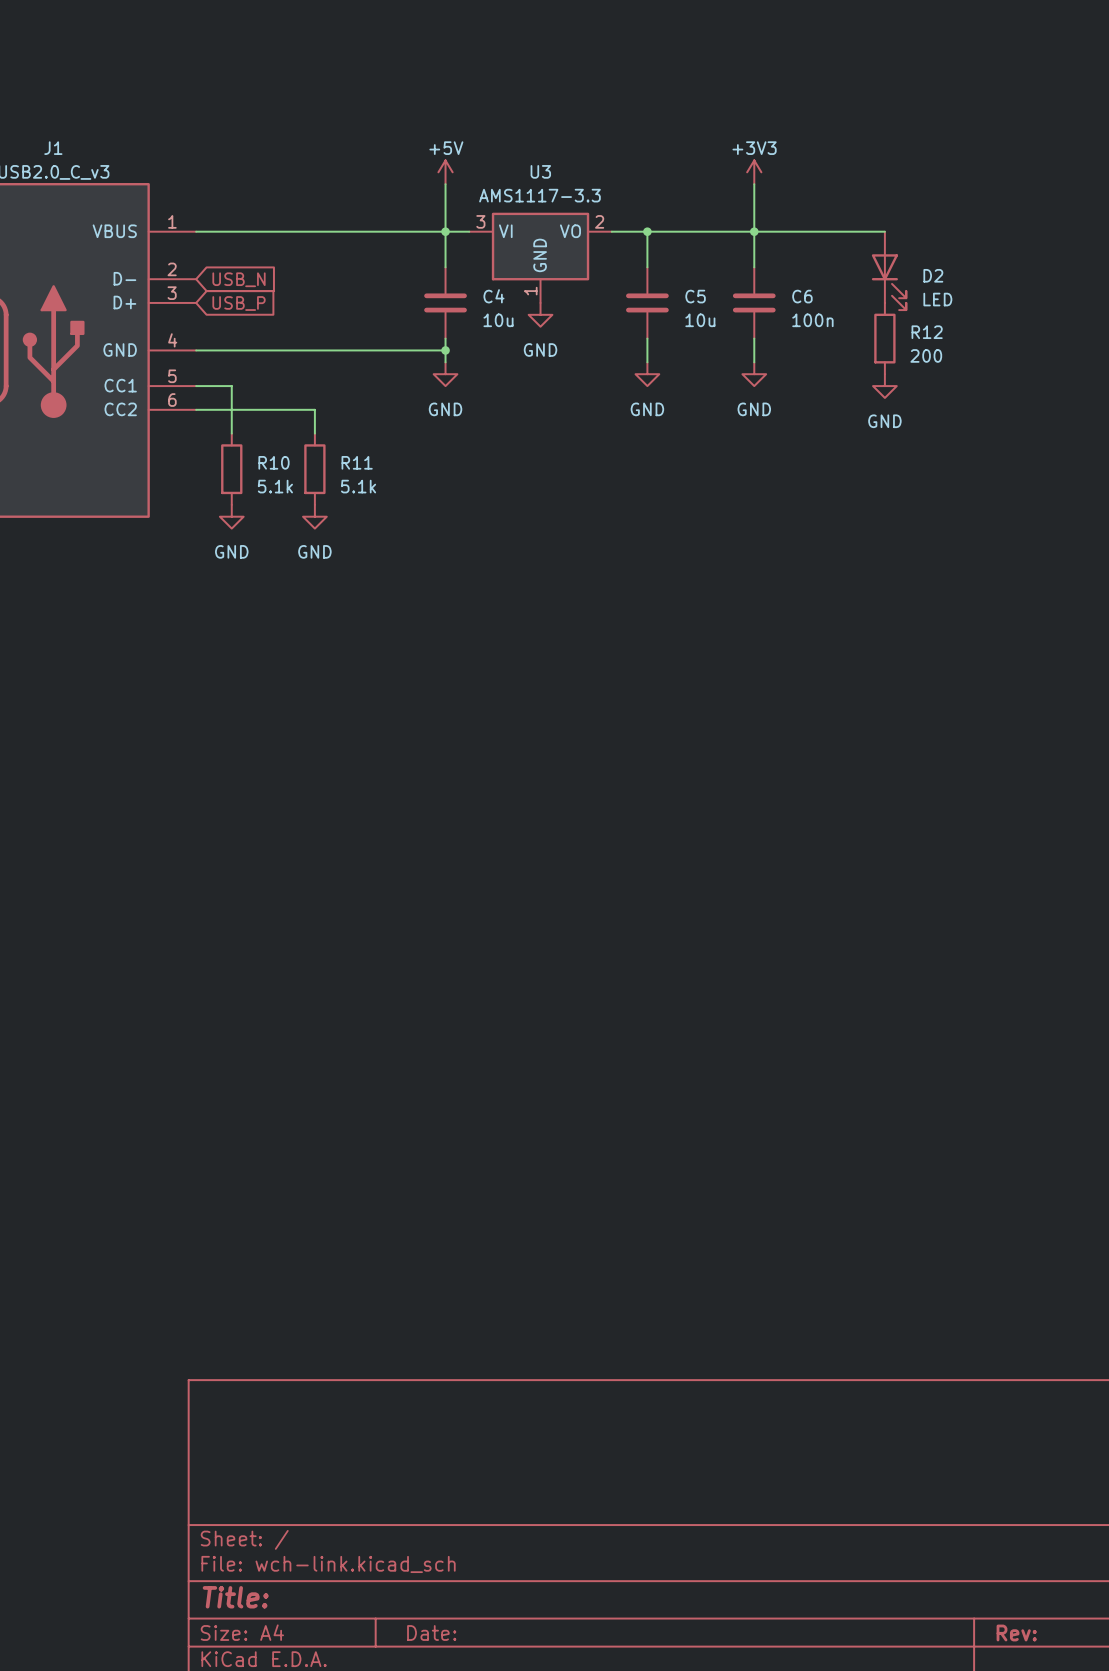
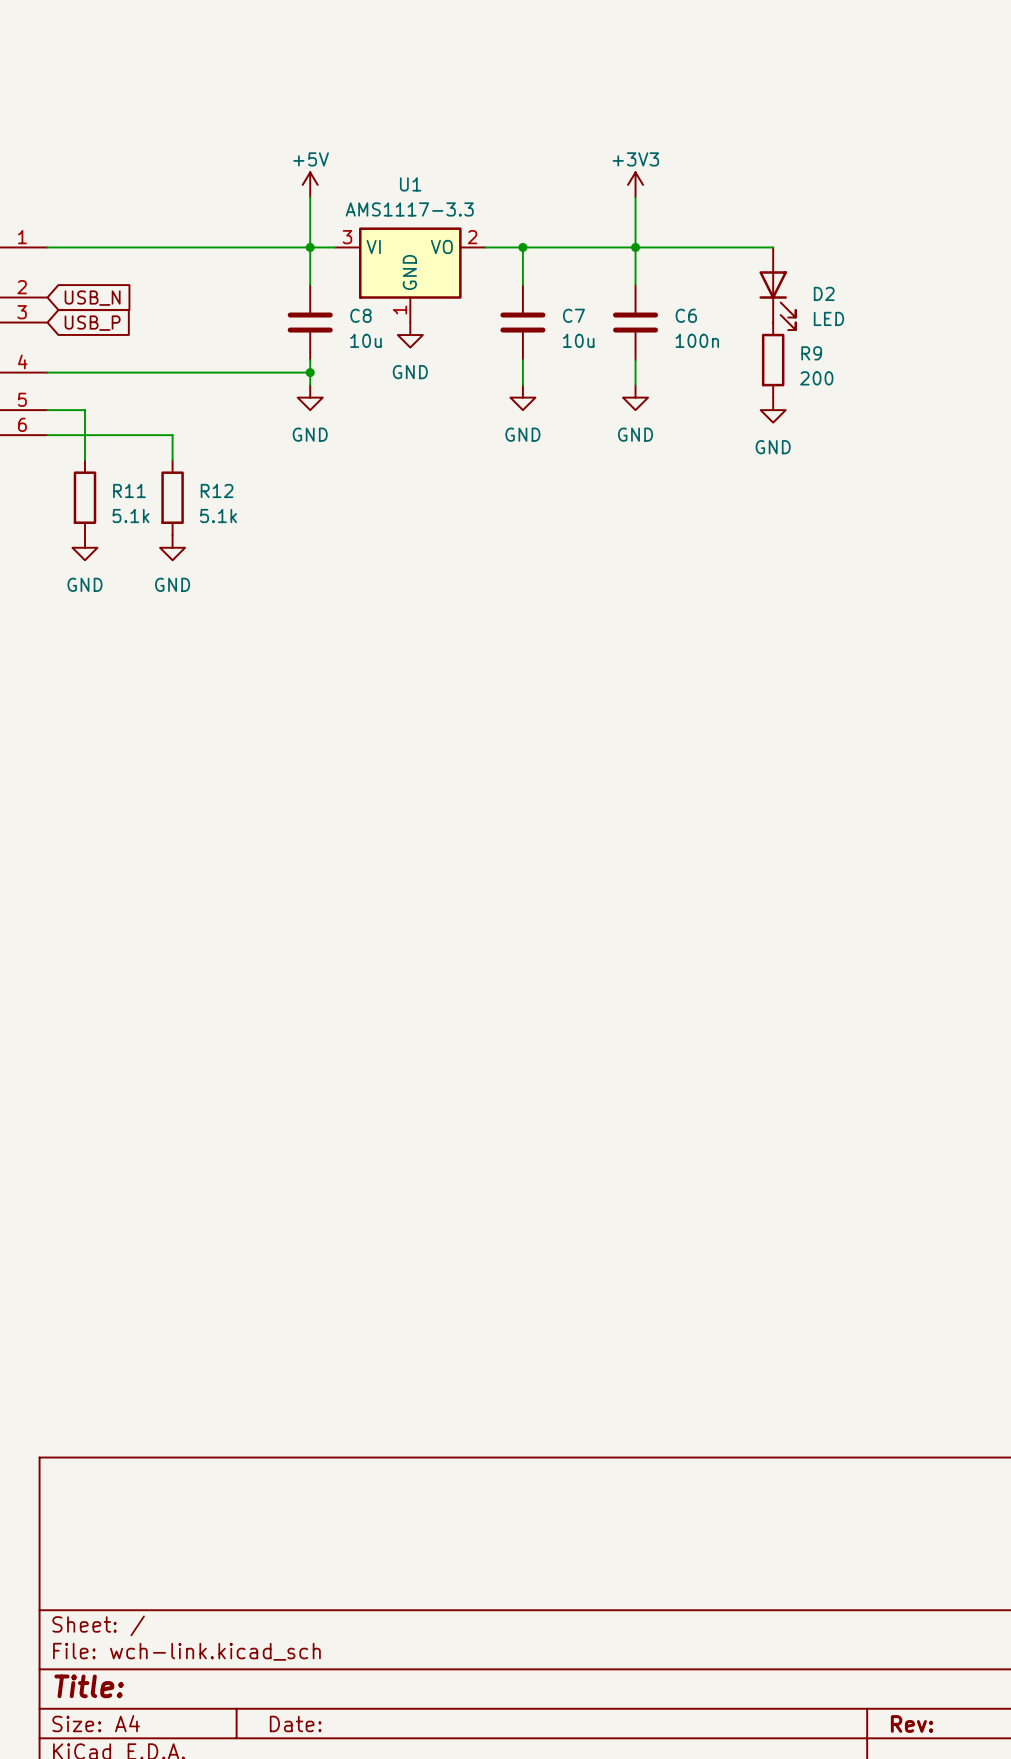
U3 name: U3 (540, 171) -> U1 (410, 184)
C4 name: C4 (493, 296) -> C8 (360, 315)
C5 name: C5 (695, 296) -> C7 (573, 315)
R12 name: R12 (927, 332) -> R9 (811, 353)
R10 name: R10 (273, 462) -> R11 (129, 490)
R11 name: R11 (357, 462) -> R12 (217, 490)

